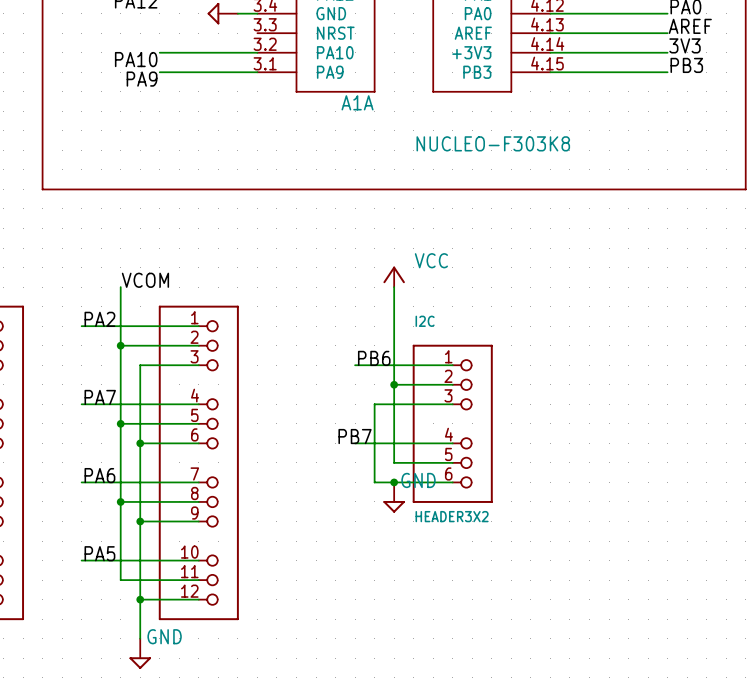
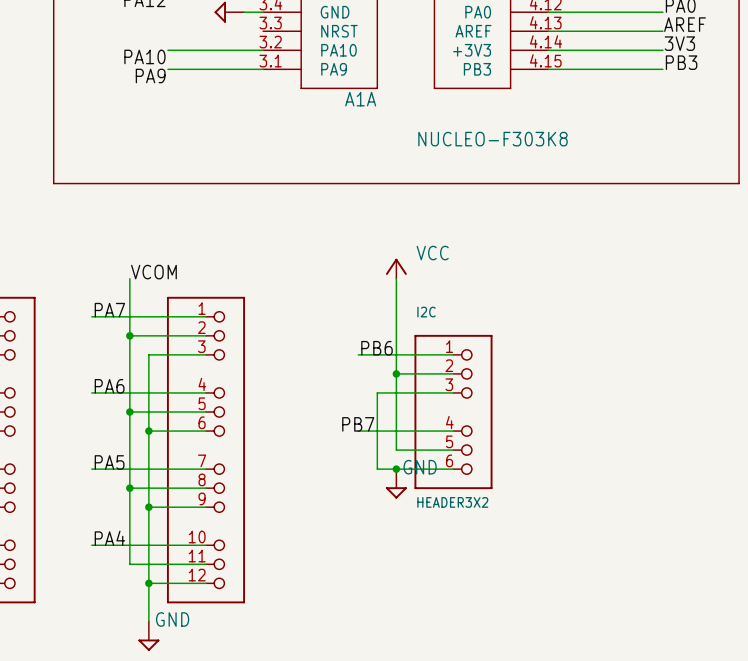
label: PA2 (99, 319) -> PA7 (109, 310)
label: PA7 (100, 397) -> PA6 (109, 386)
label: PA6 (99, 475) -> PA5 (109, 462)
label: PA5 (99, 553) -> PA4 (109, 538)

